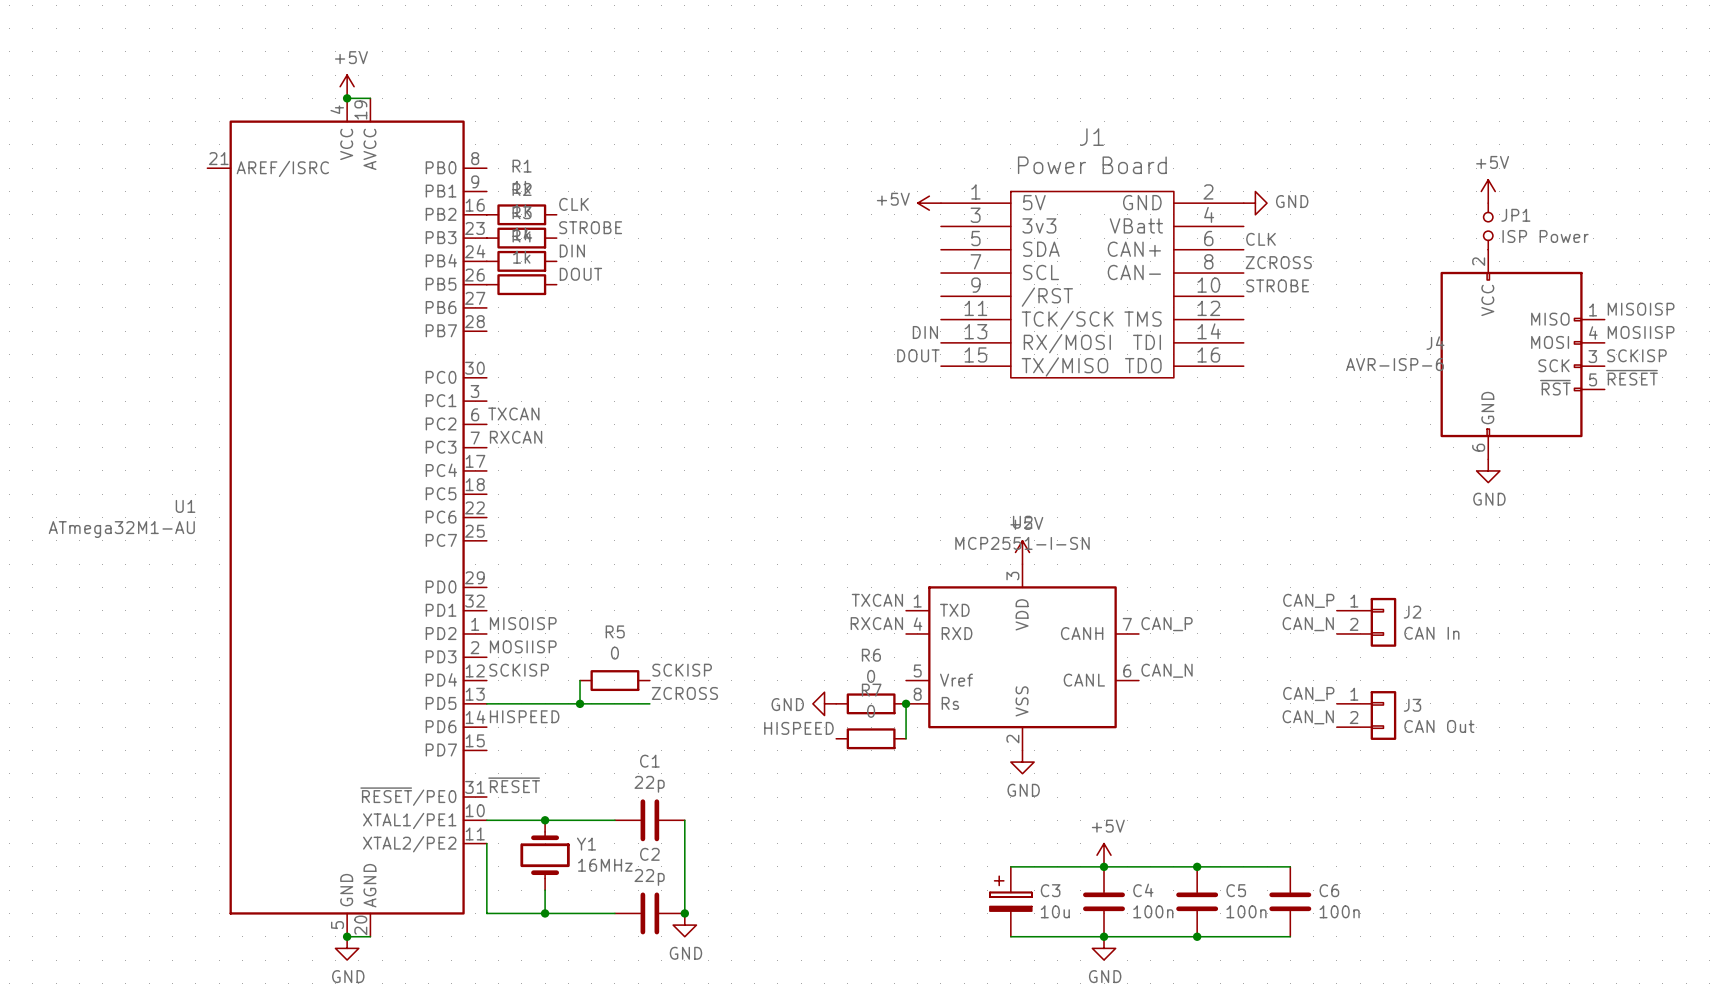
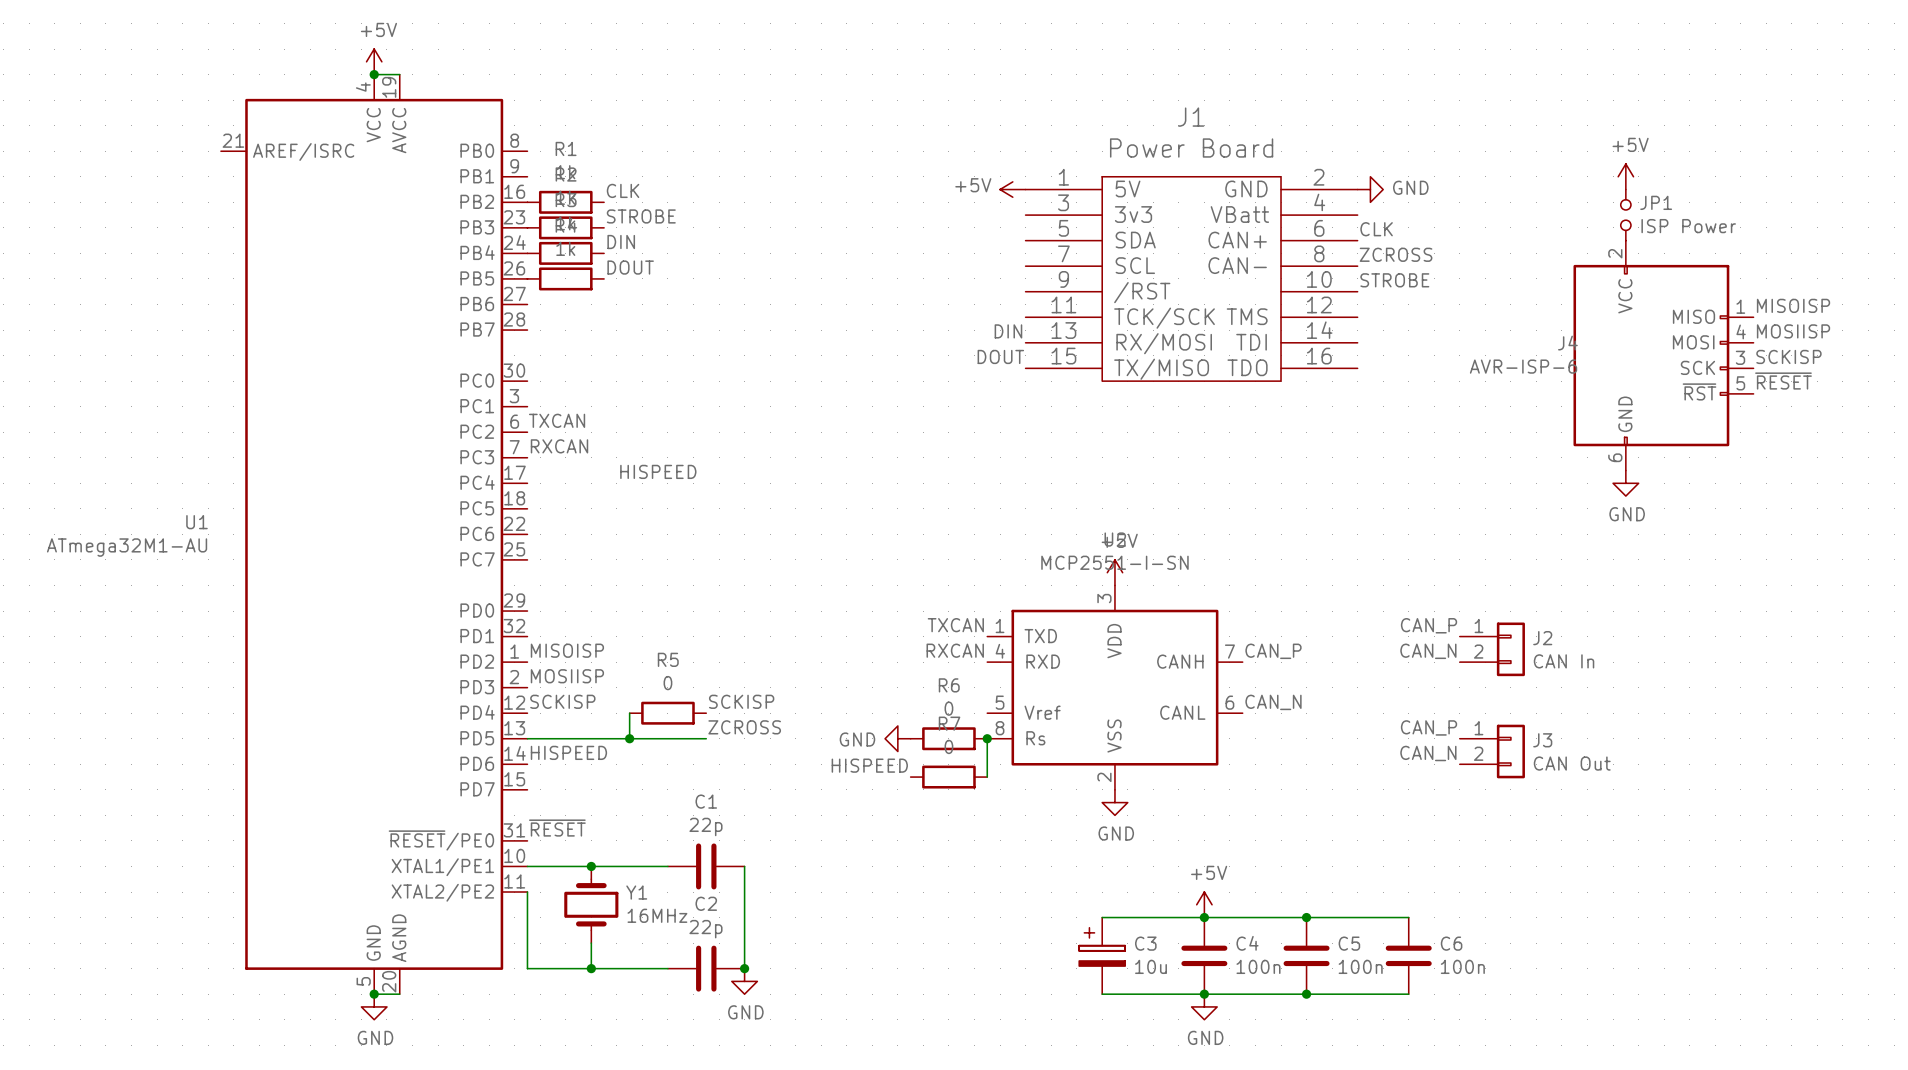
label: none -> HISPEED (658, 471)

